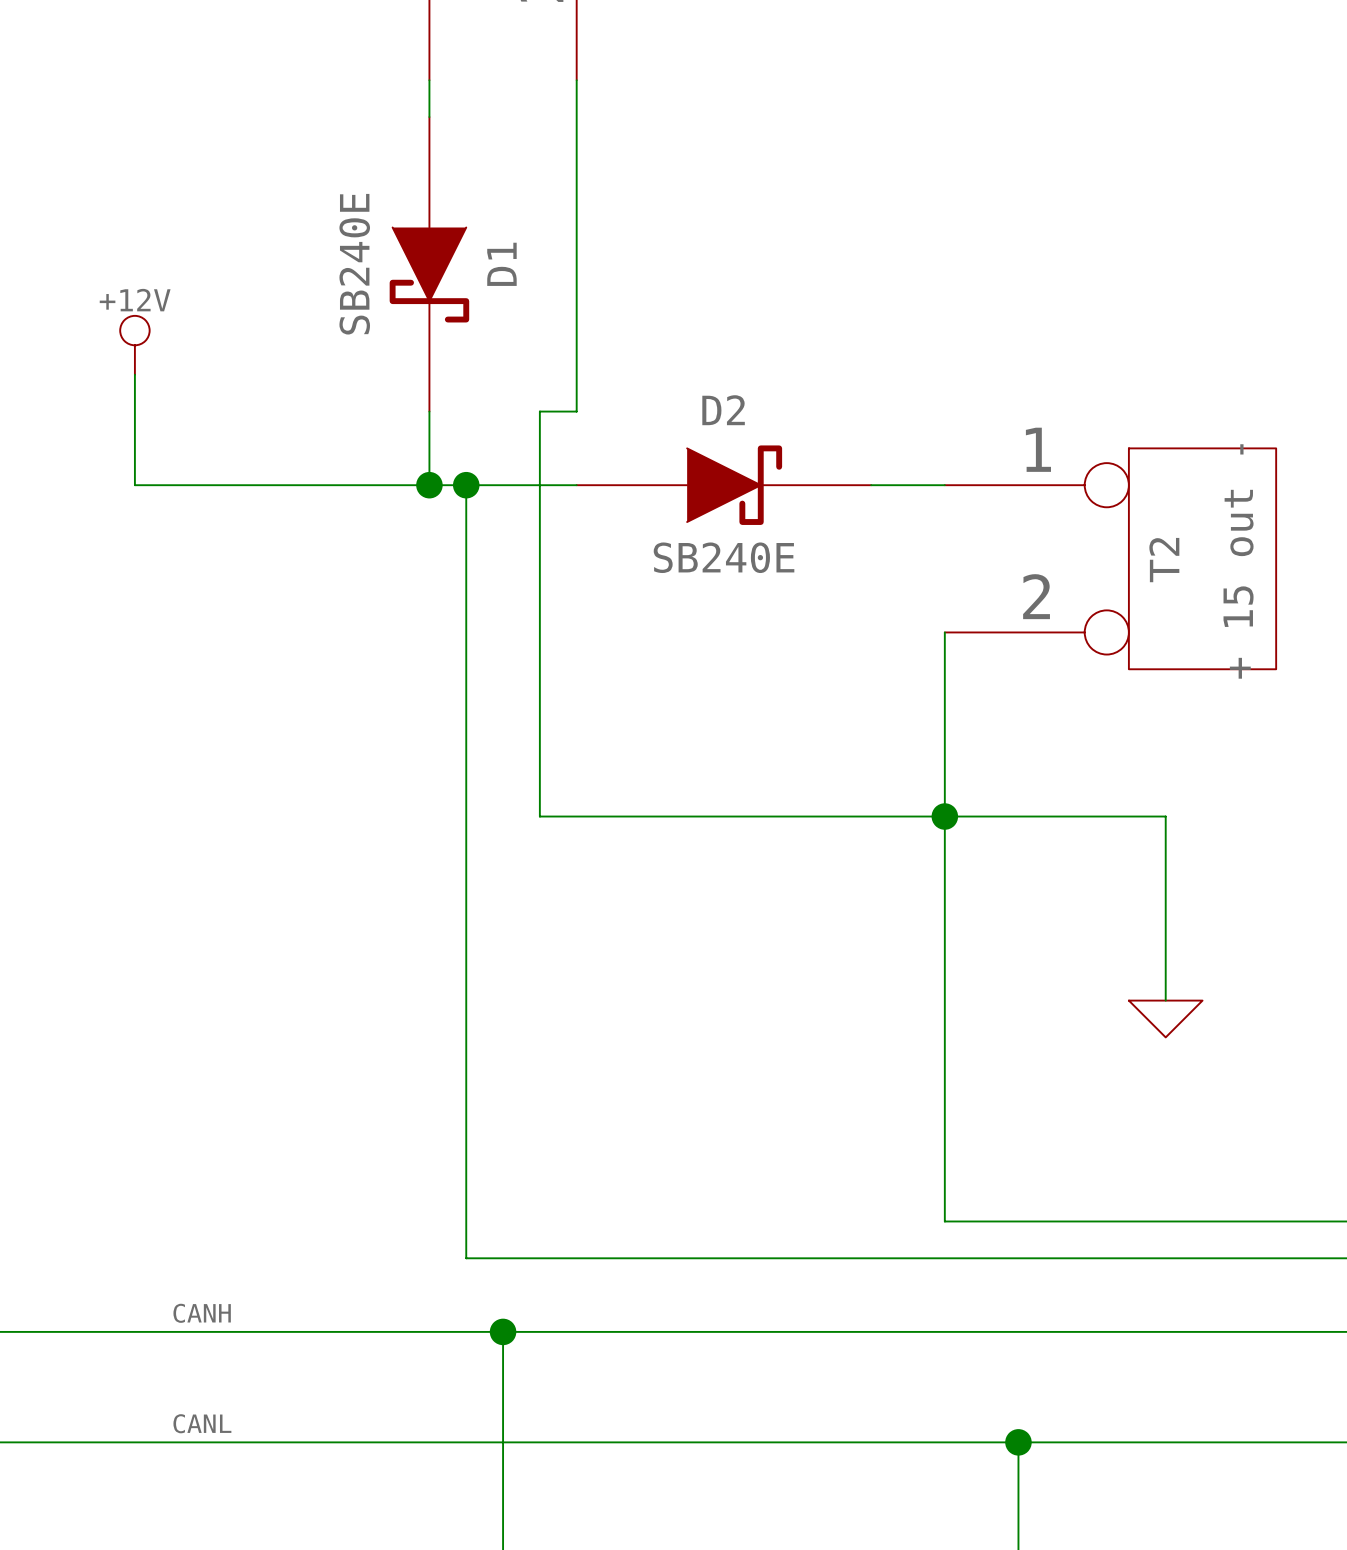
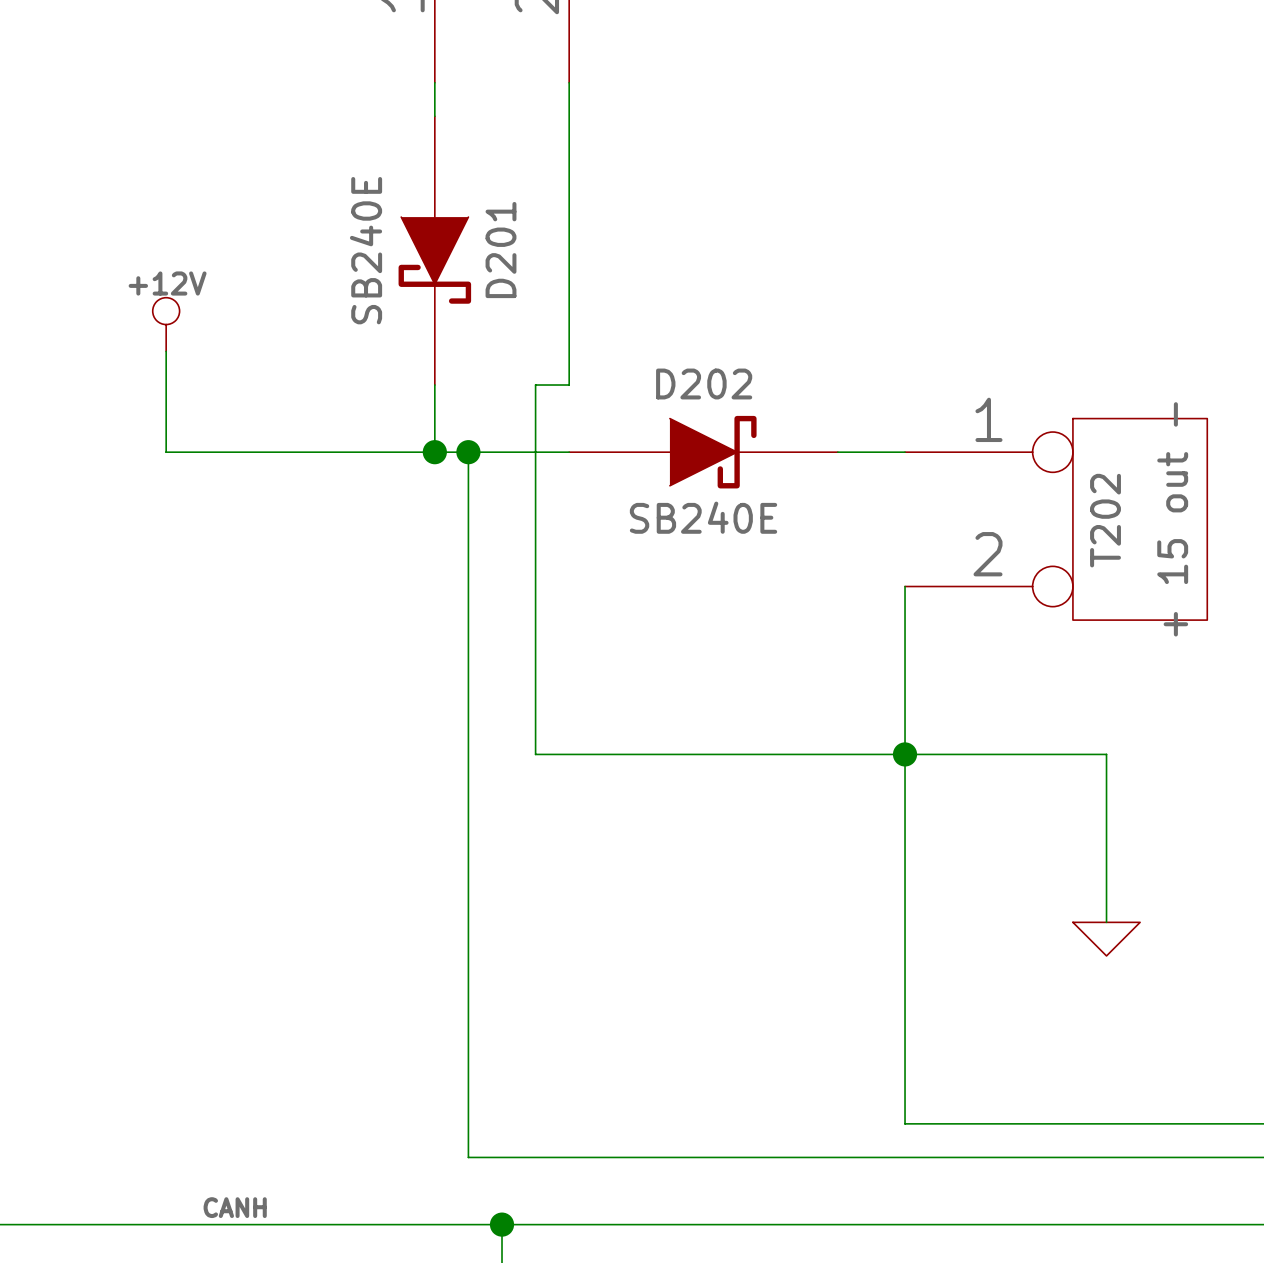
D1 name: D1 (501, 264) -> D201 (501, 250)
D2 name: D2 (723, 410) -> D202 (704, 384)
T2 name: T2 (1164, 560) -> T202 (1105, 520)

